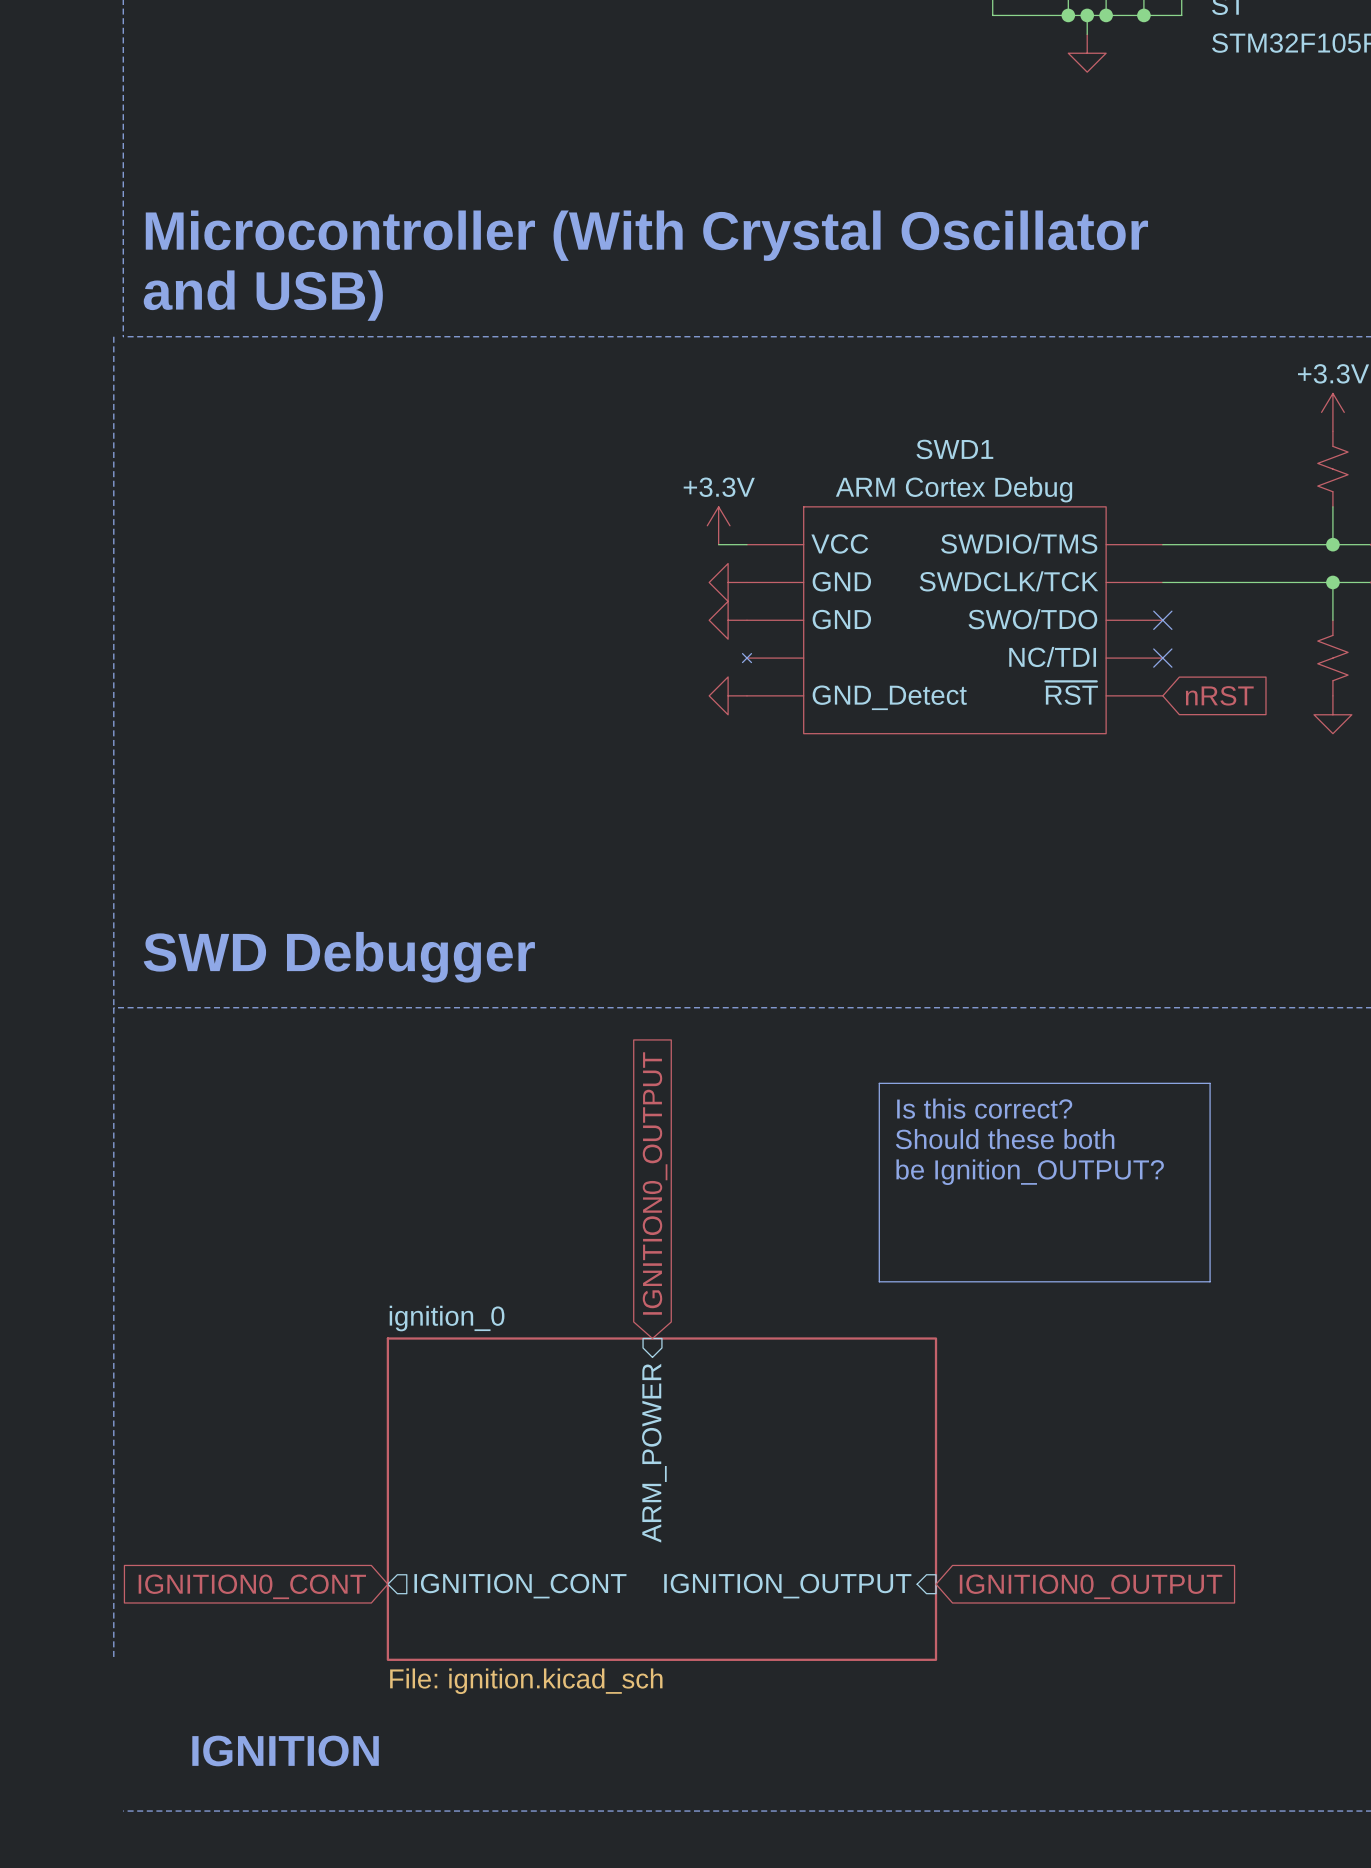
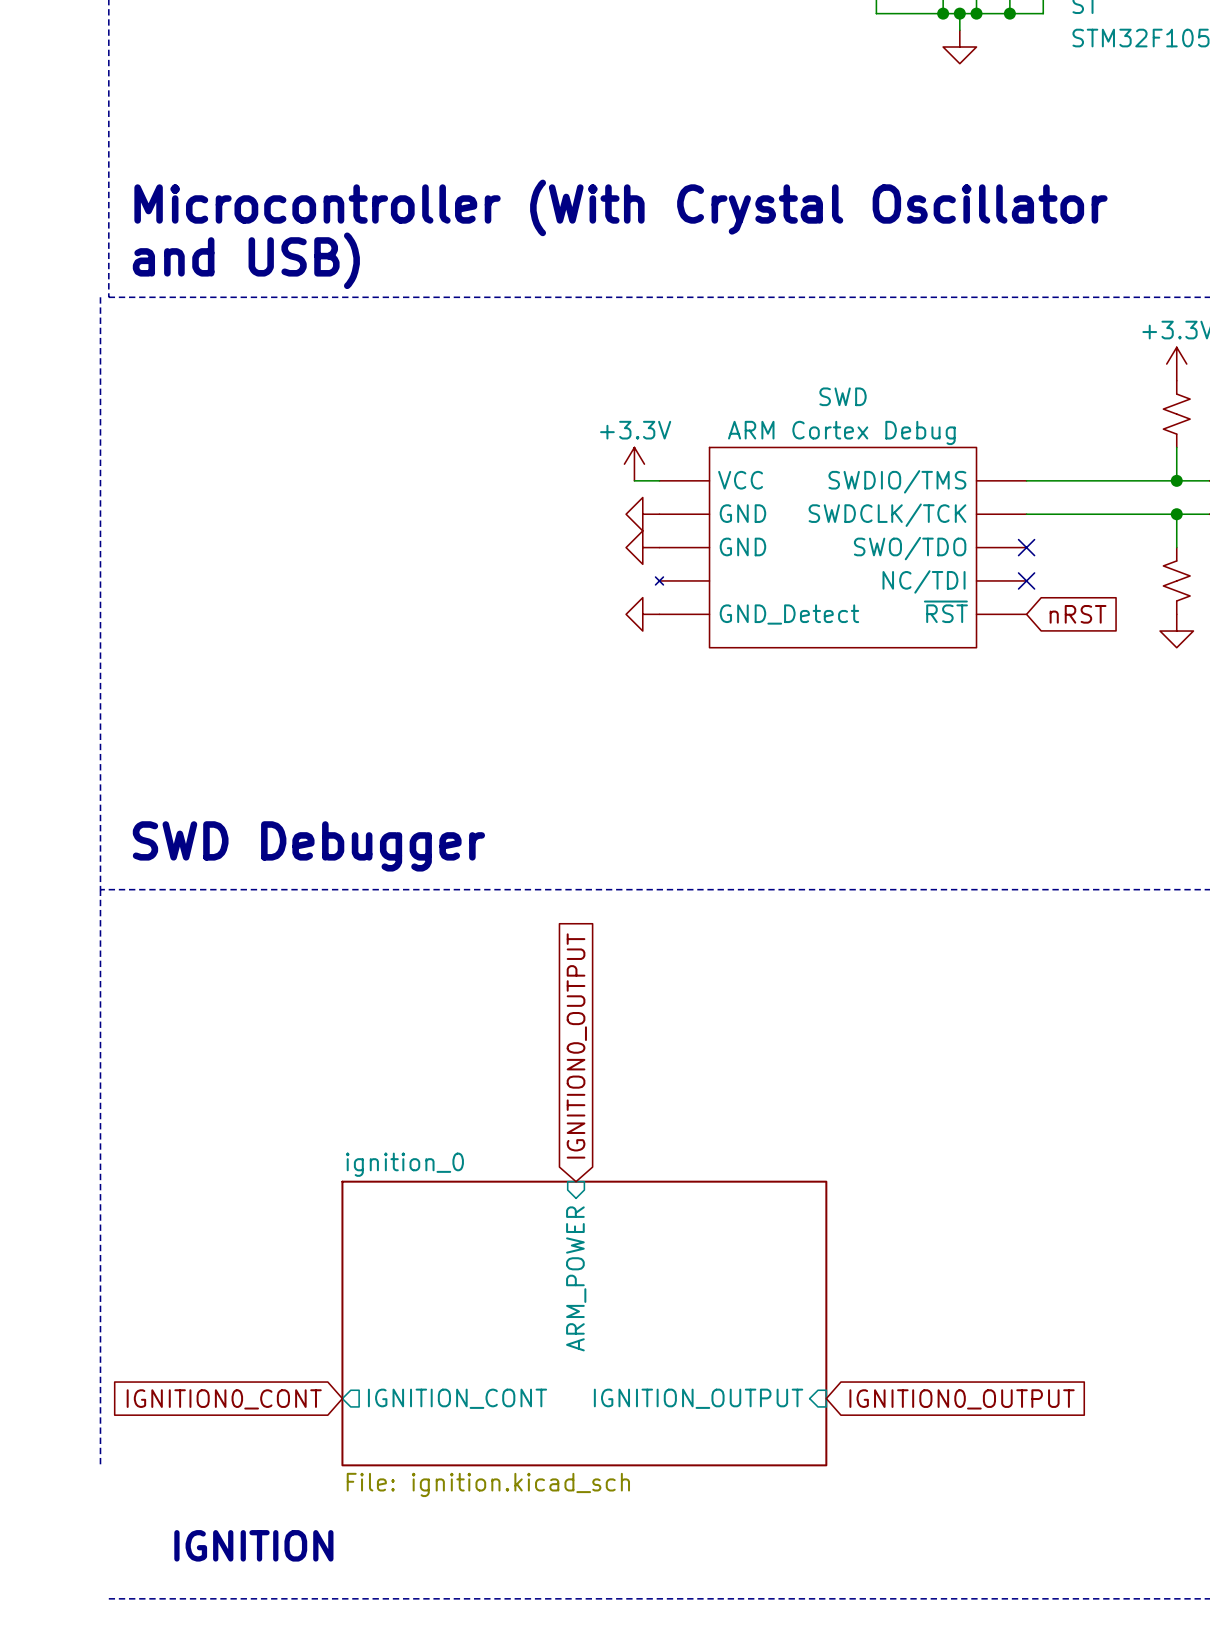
SWD1 name: SWD1 (954, 449) -> SWD (843, 396)
line: (879, 1083) (1210, 1083) (1210, 1281) (879, 1281) (879, 1083) -> none
text: Is this correct? (984, 1108) -> none
text: Should these both (1005, 1139) -> none
text: be Ignition_OUTPUT? (1030, 1172) -> none

